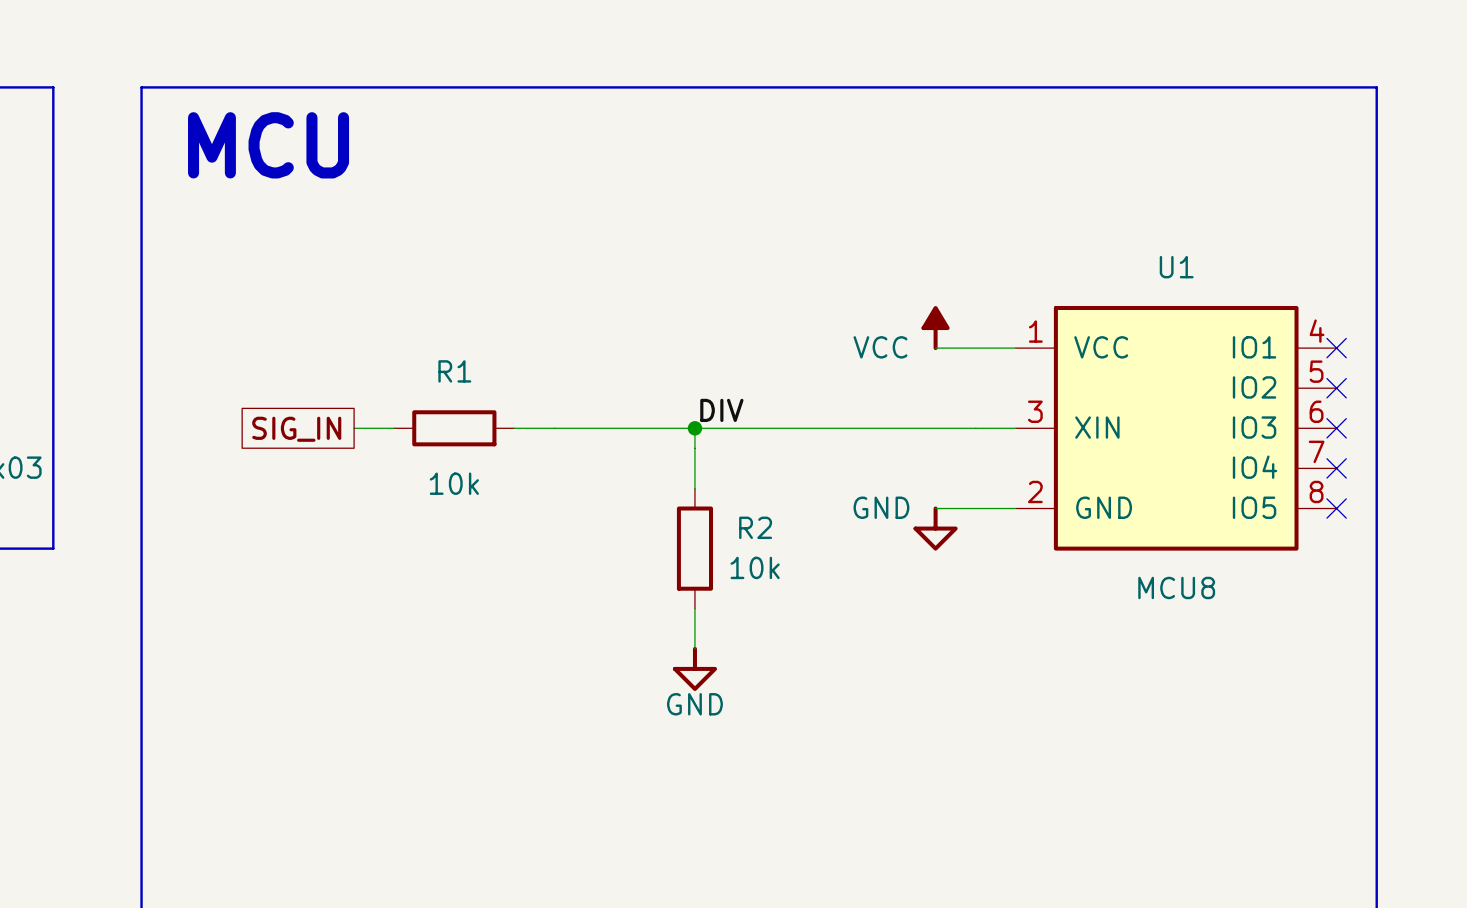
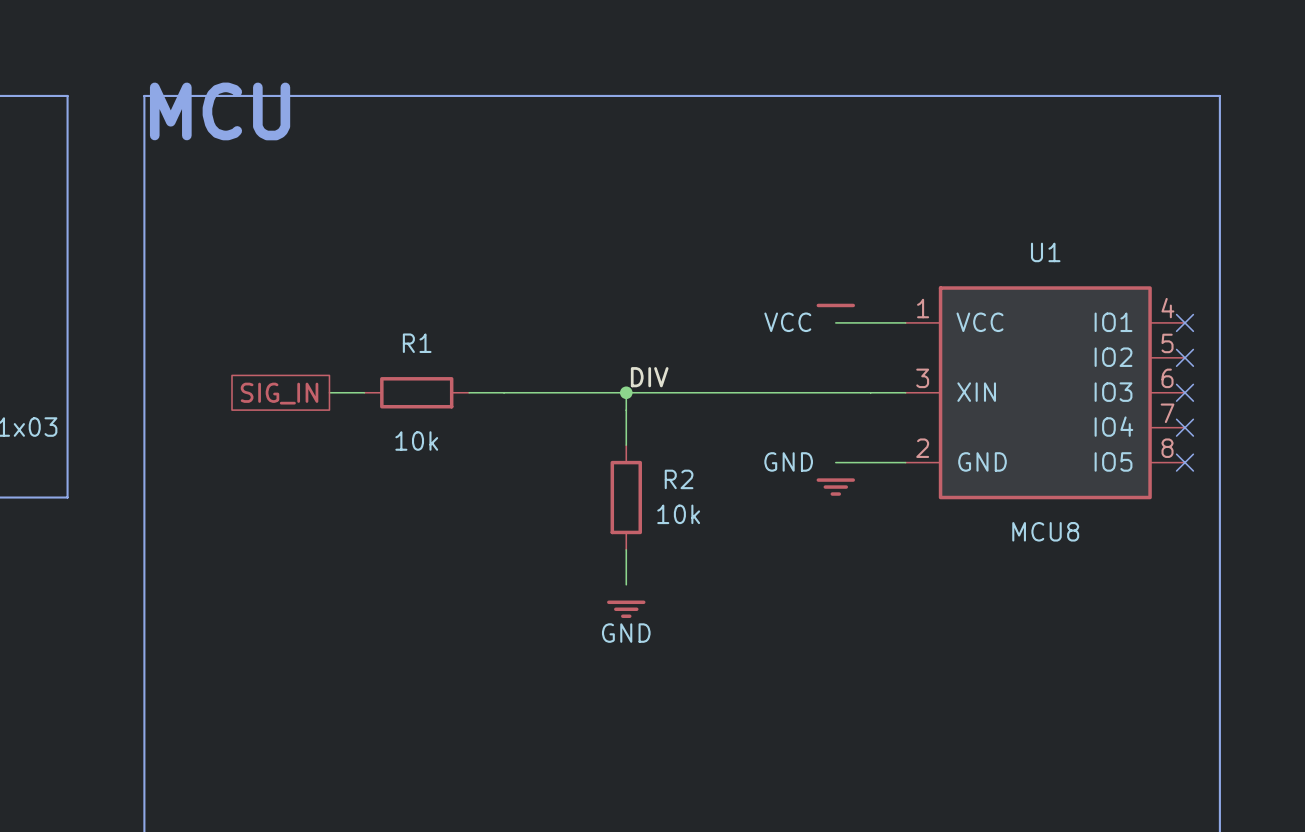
text position: MCU (268, 145) -> MCU (220, 111)
power symbol shape: [921, 305, 950, 351] -> [816, 303, 855, 308]
power symbol shape: [913, 506, 958, 551] -> [816, 478, 855, 496]
power symbol shape: [672, 646, 718, 691] -> [607, 600, 646, 618]

